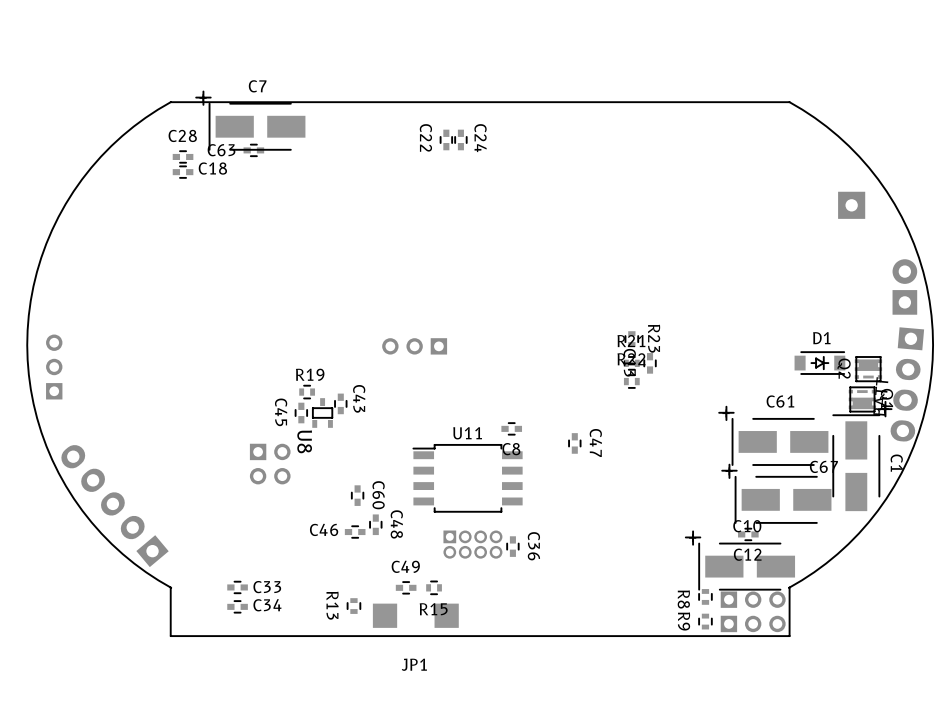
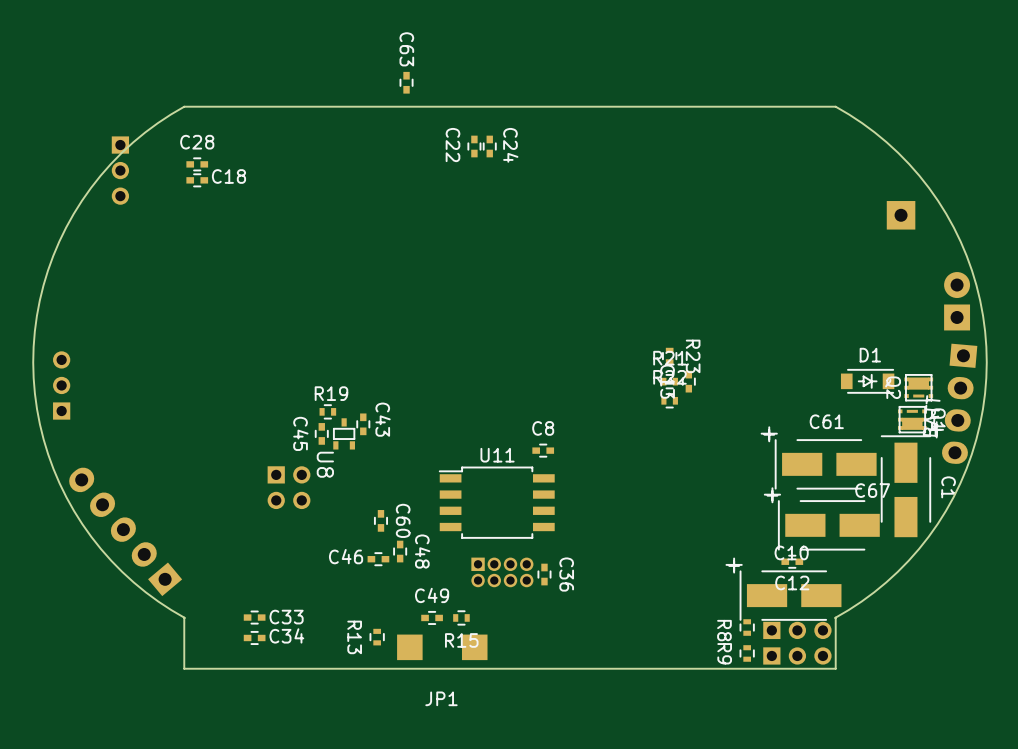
C7: (250, 120) -> none
C63 rotation: 0° (253, 150) -> 90° clockwise (406, 82)
C63 position: (253, 150) -> (406, 82)
part: none -> (120, 170)
part: (414, 346) -> none
C47: (574, 443) -> none
C8 name position: C8 (511, 449) -> C8 (543, 428)

